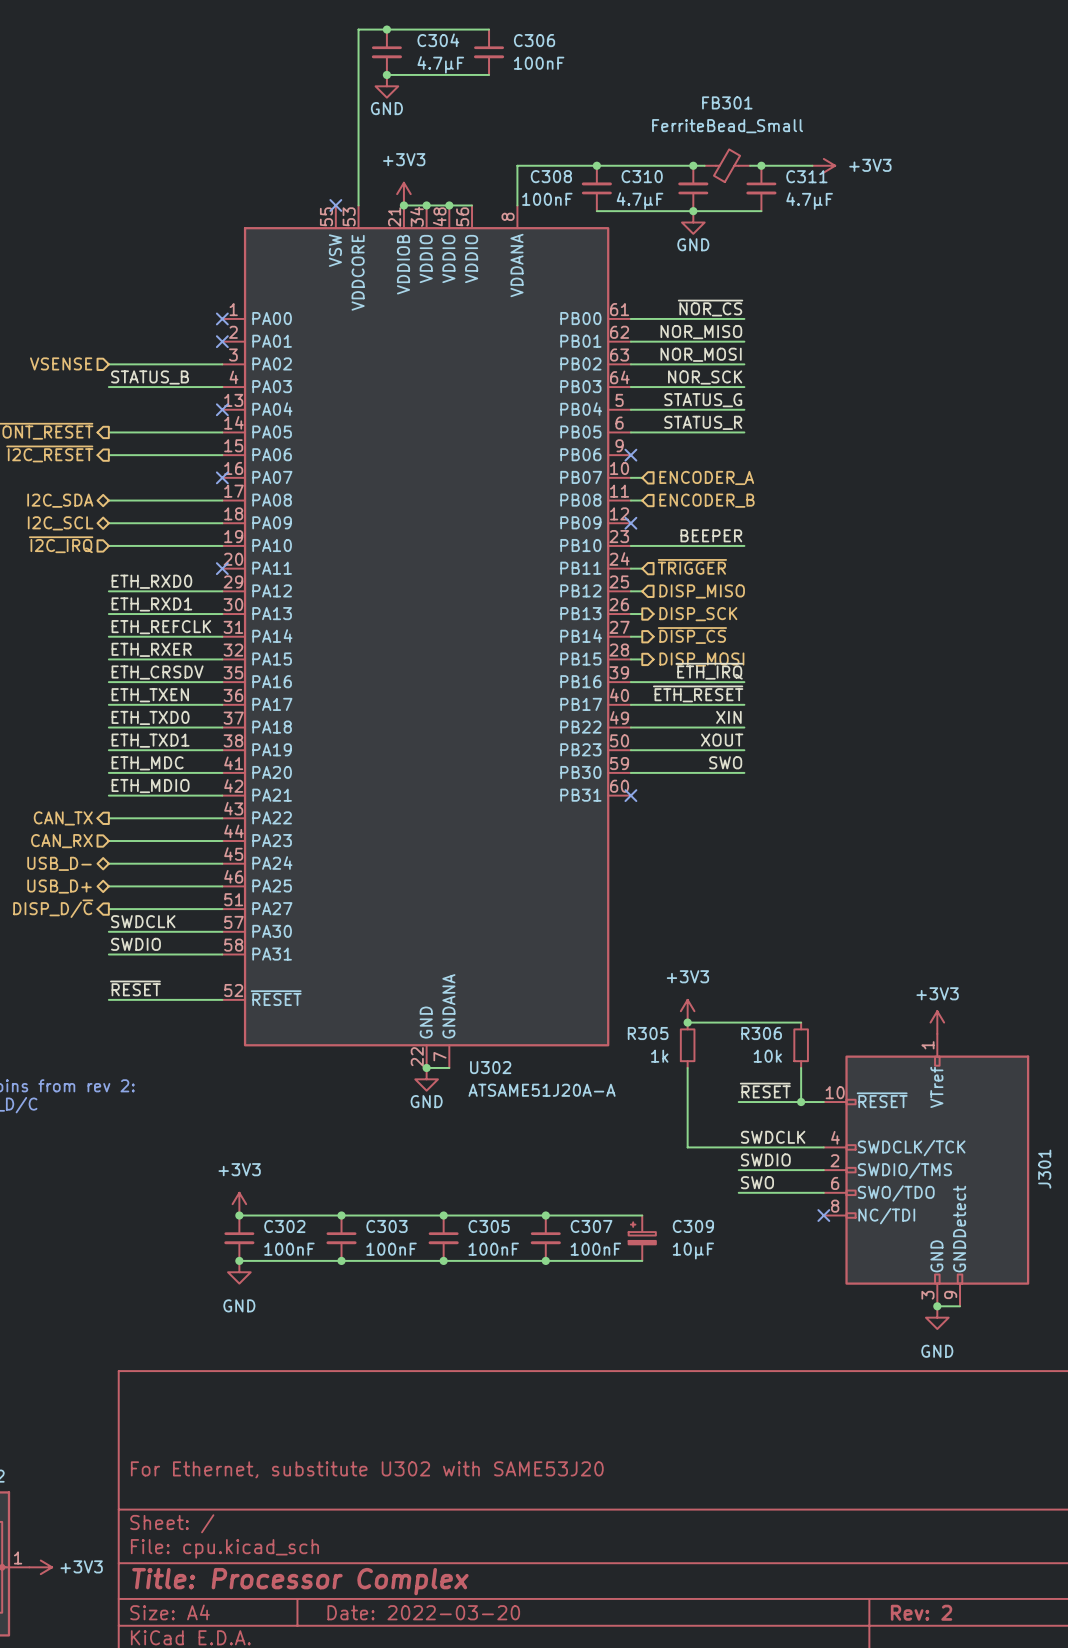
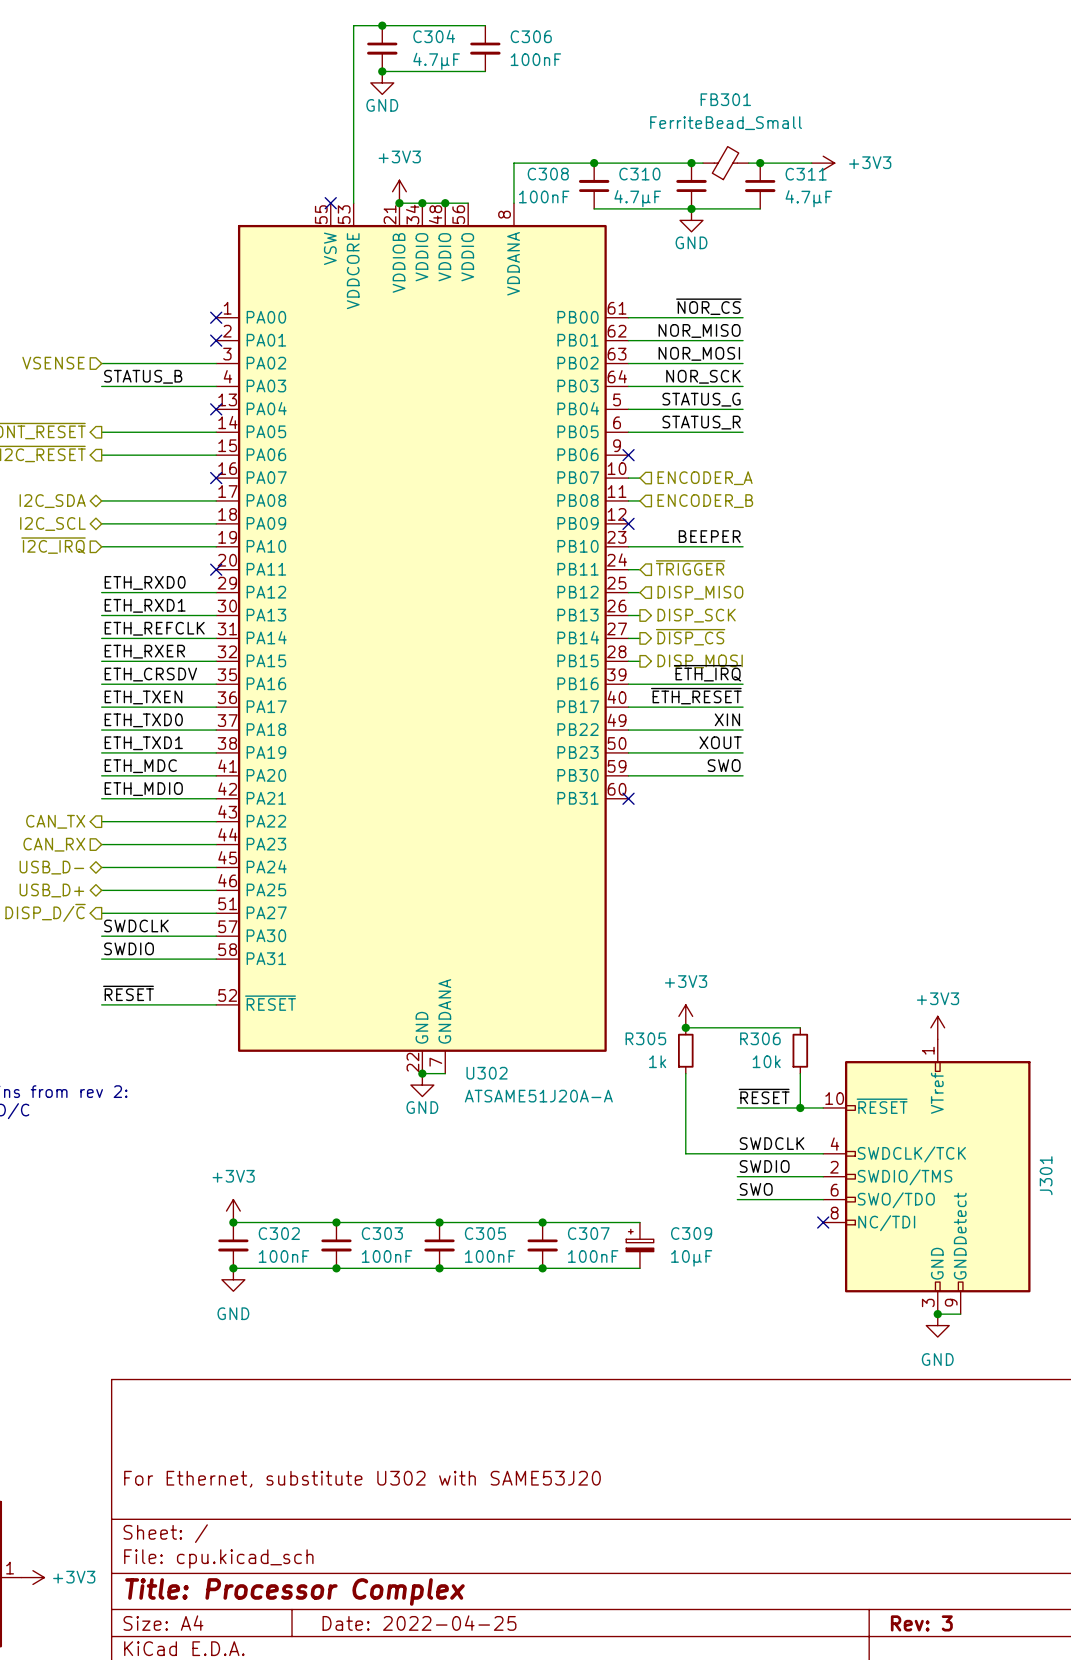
title block: Date: 2022-03-20 (423, 1612) -> Date: 2022-04-25 (419, 1623)
title block: Rev: 2 (921, 1612) -> Rev: 3 (921, 1623)

